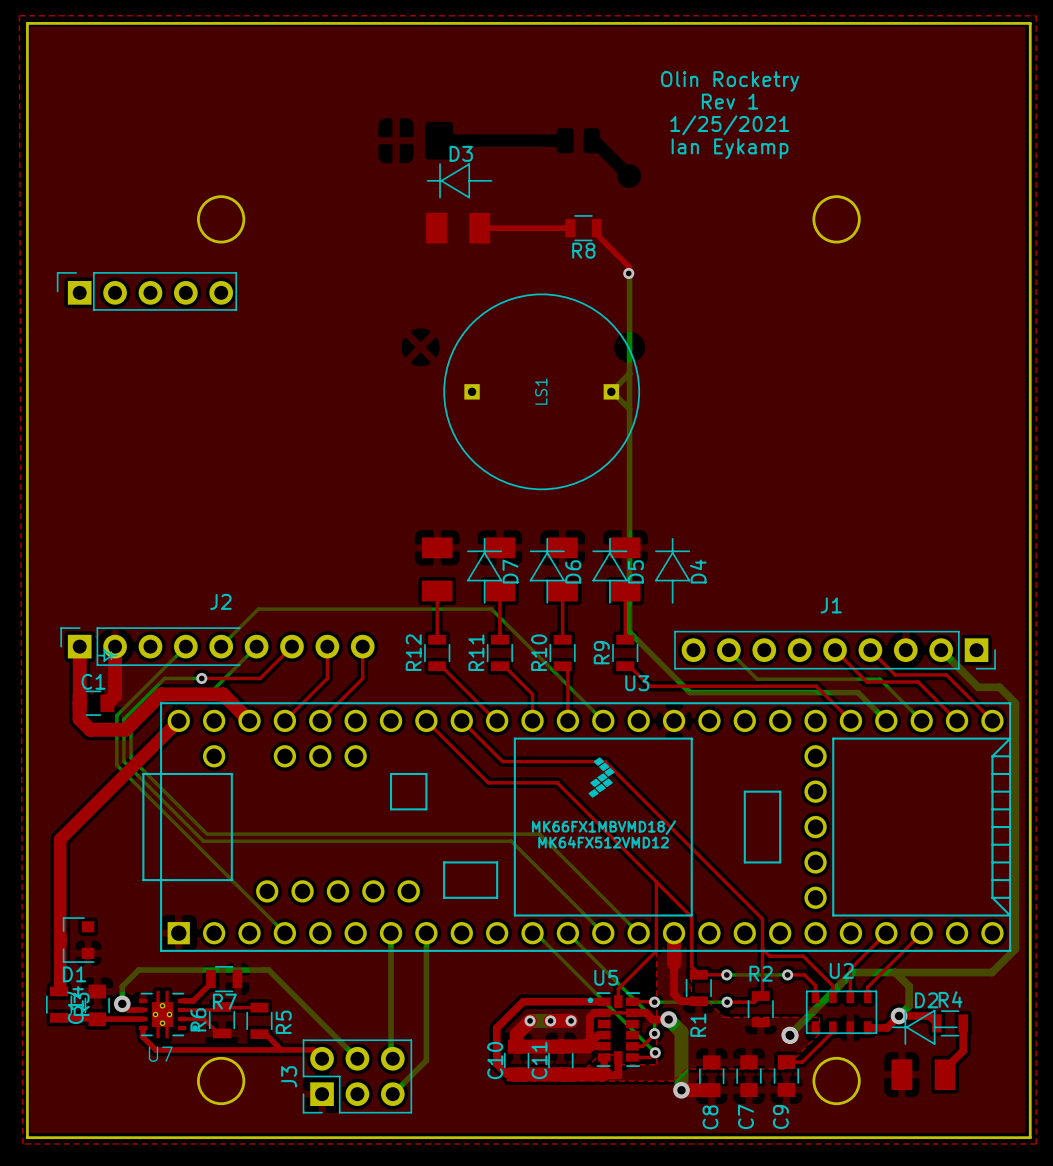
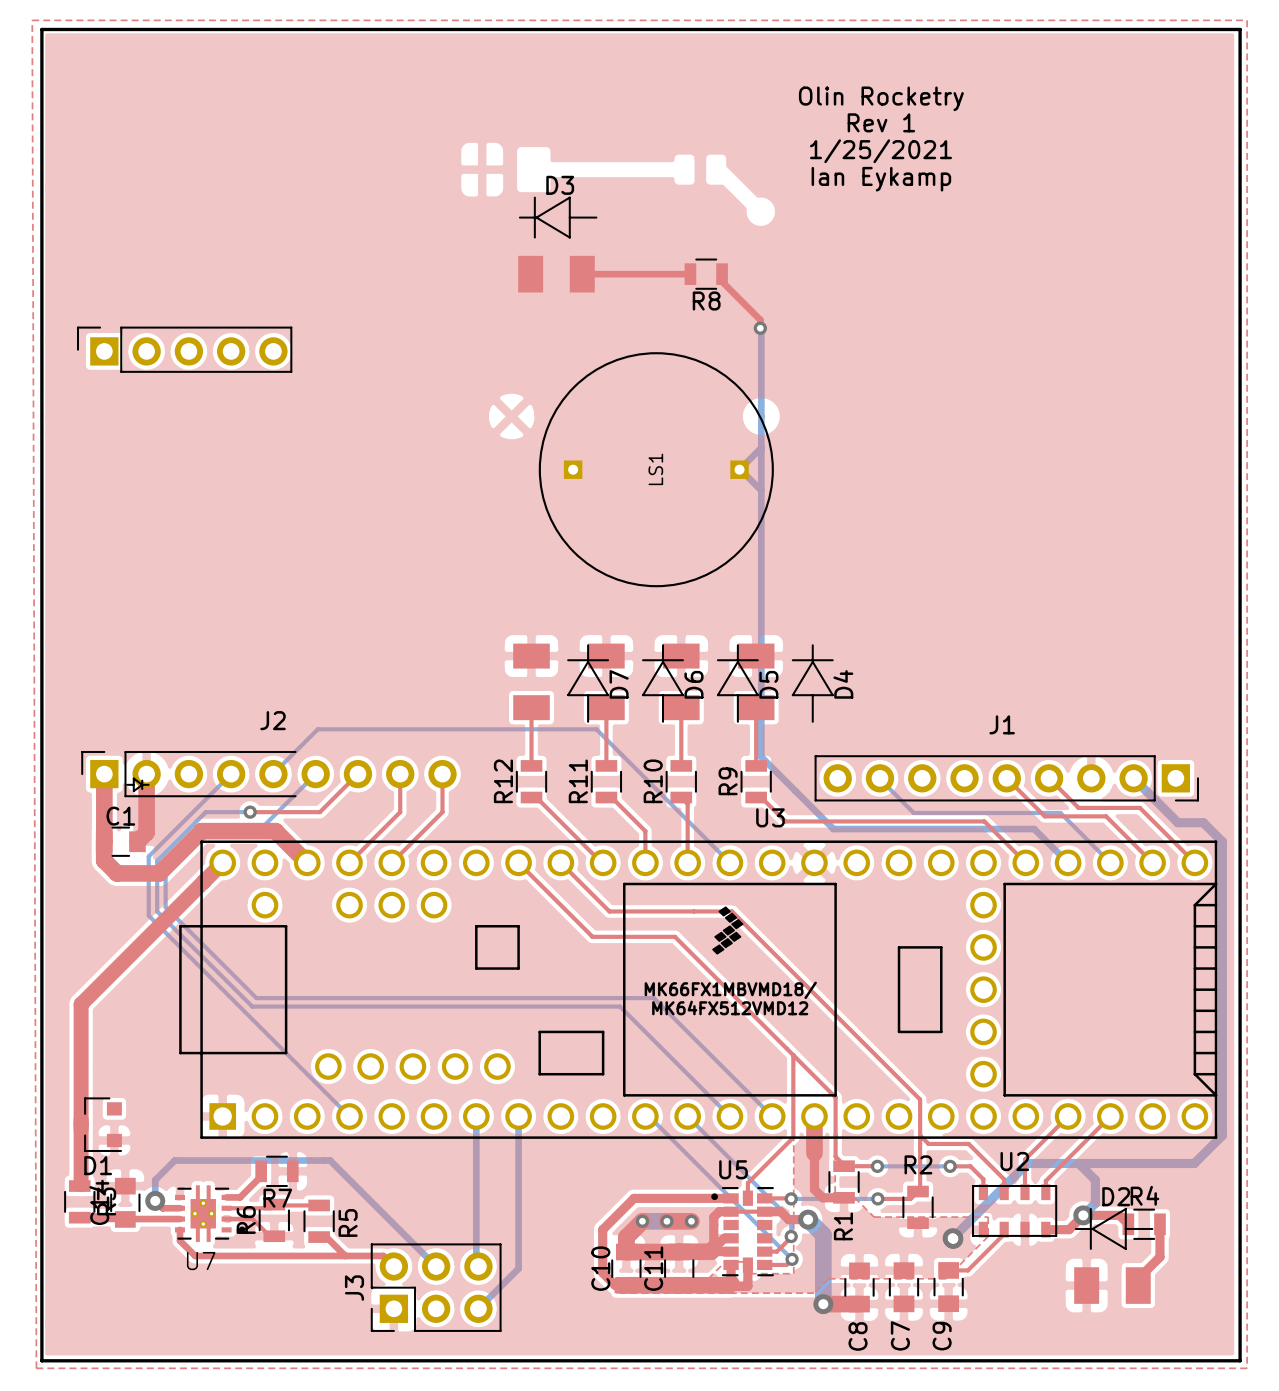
round board edge: [197, 195, 246, 244] -> none
round board edge: [812, 195, 861, 244] -> none
round board edge: [197, 1056, 246, 1106] -> none
round board edge: [812, 1056, 861, 1106] -> none

